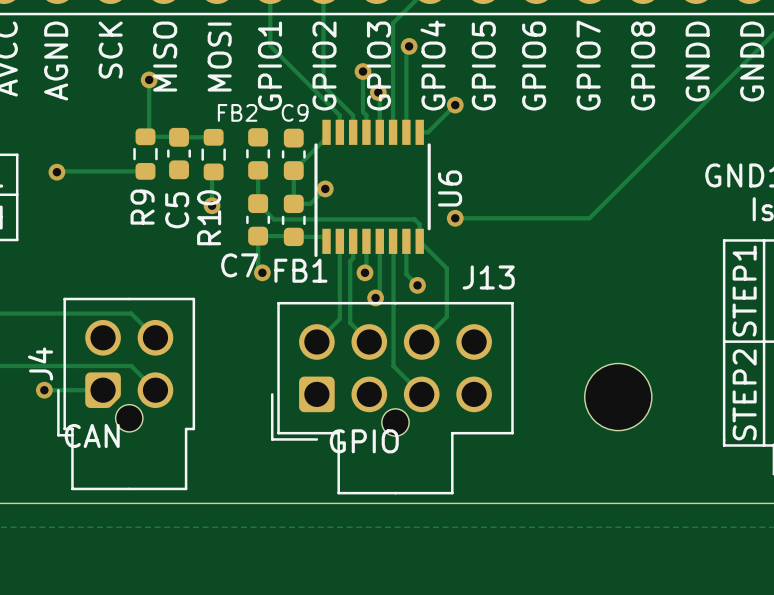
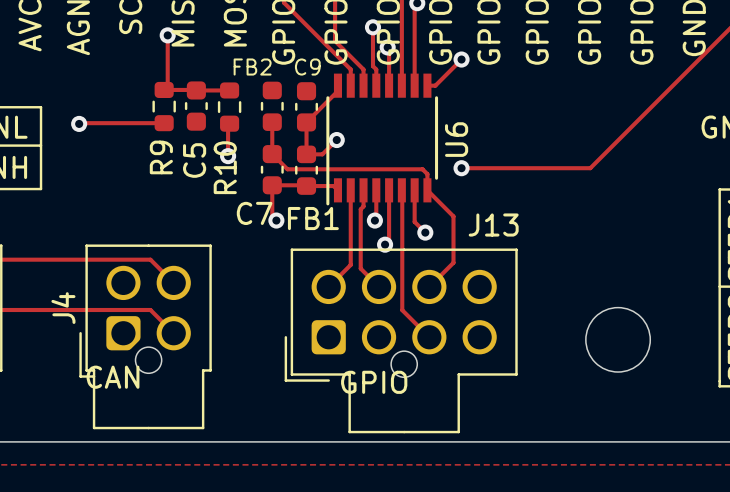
track: (44, 390) (103, 390) -> none
via: (44, 390) -> none

